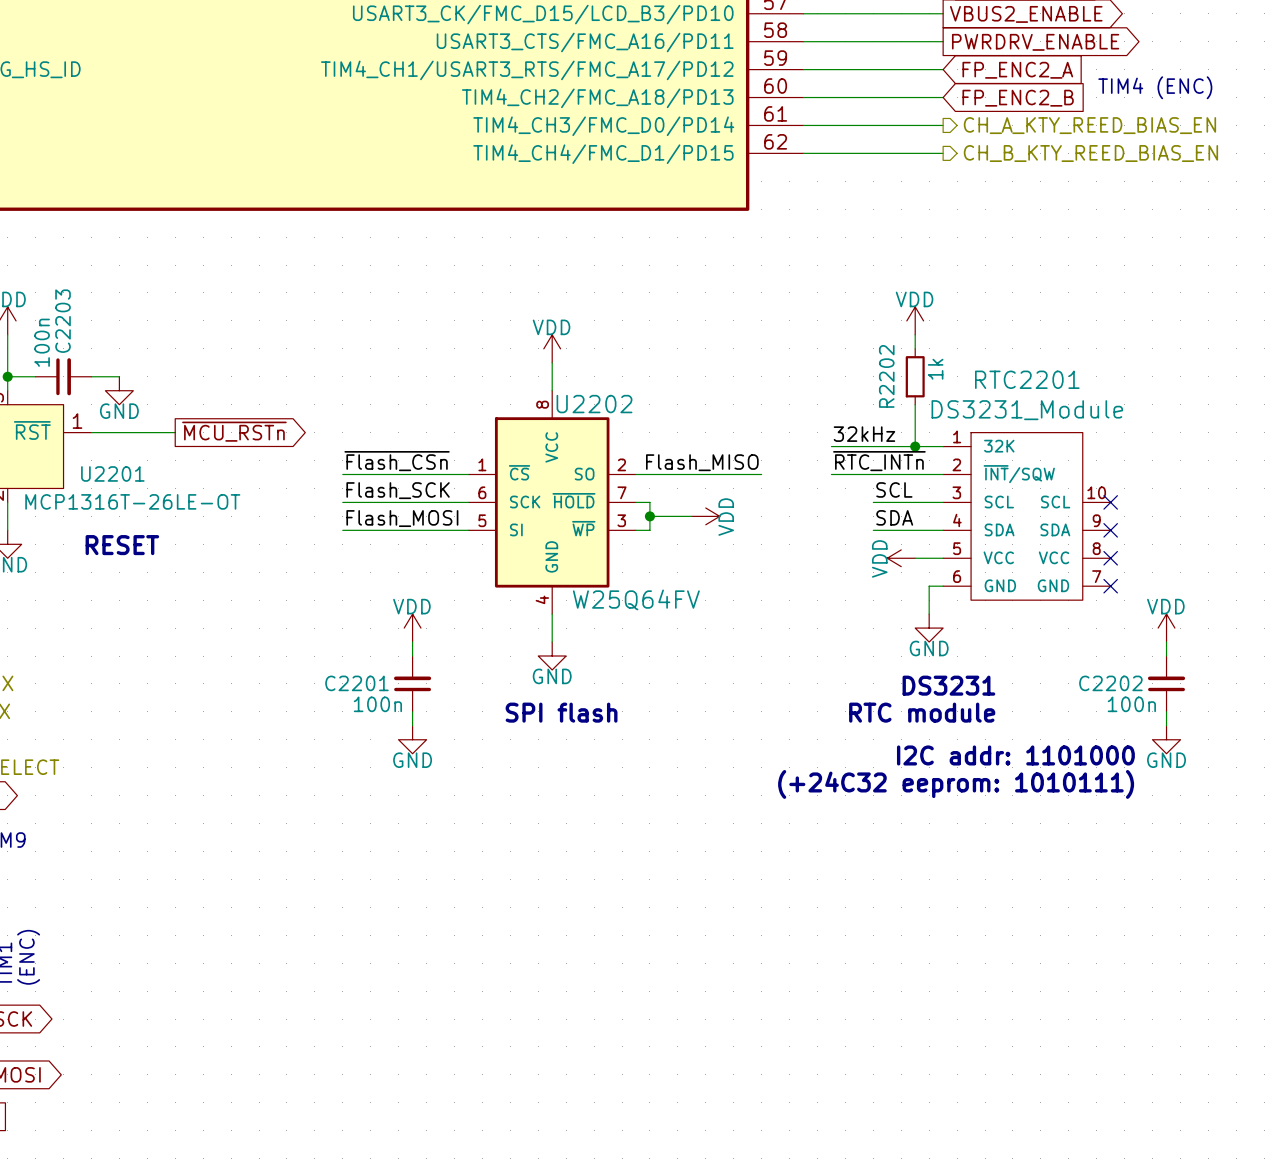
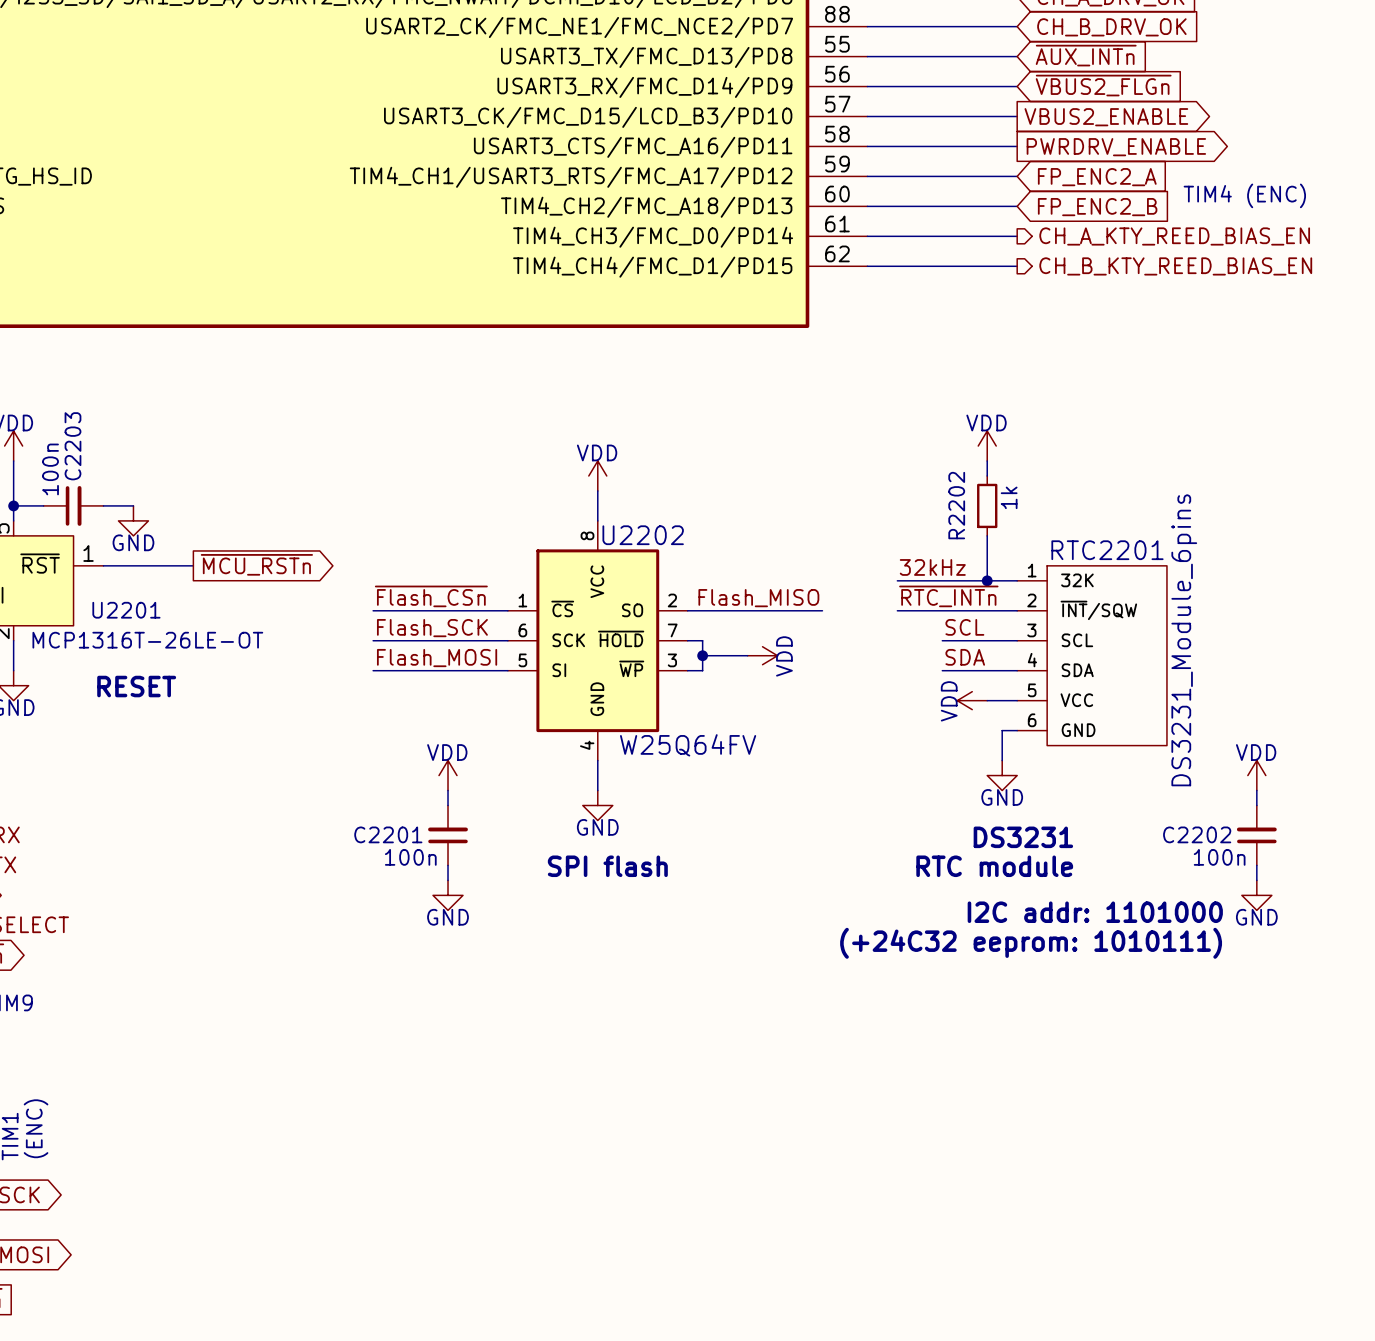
RTC2201 name position: RTC2201 (1027, 379) -> RTC2201 (1107, 550)
RTC2201 value: DS3231_Module (1027, 410) -> DS3231_Module_6pins (1184, 640)
RTC2201 symbol: [943, 432, 1111, 601] -> [1017, 565, 1167, 746]
no-connect mark: (1110, 502) -> none
no-connect mark: (1110, 530) -> none
no-connect mark: (1110, 558) -> none
no-connect mark: (1110, 586) -> none

